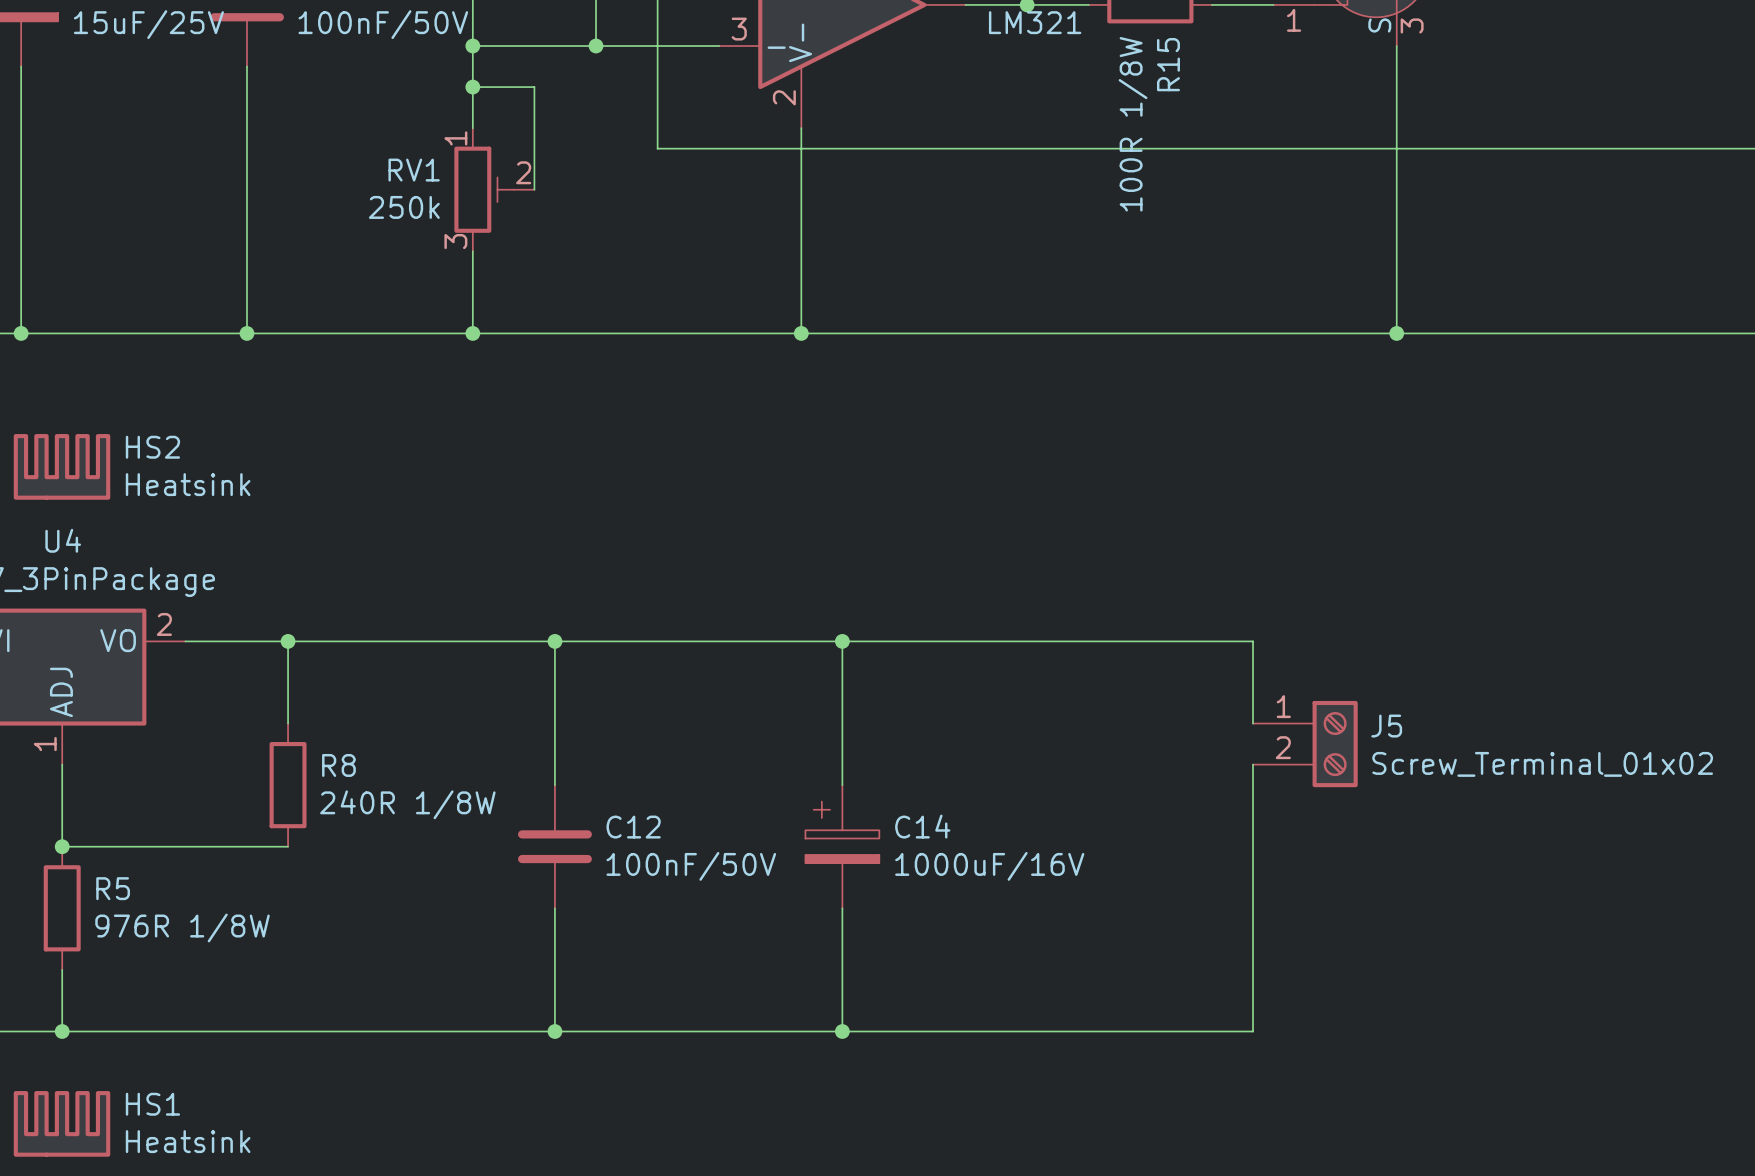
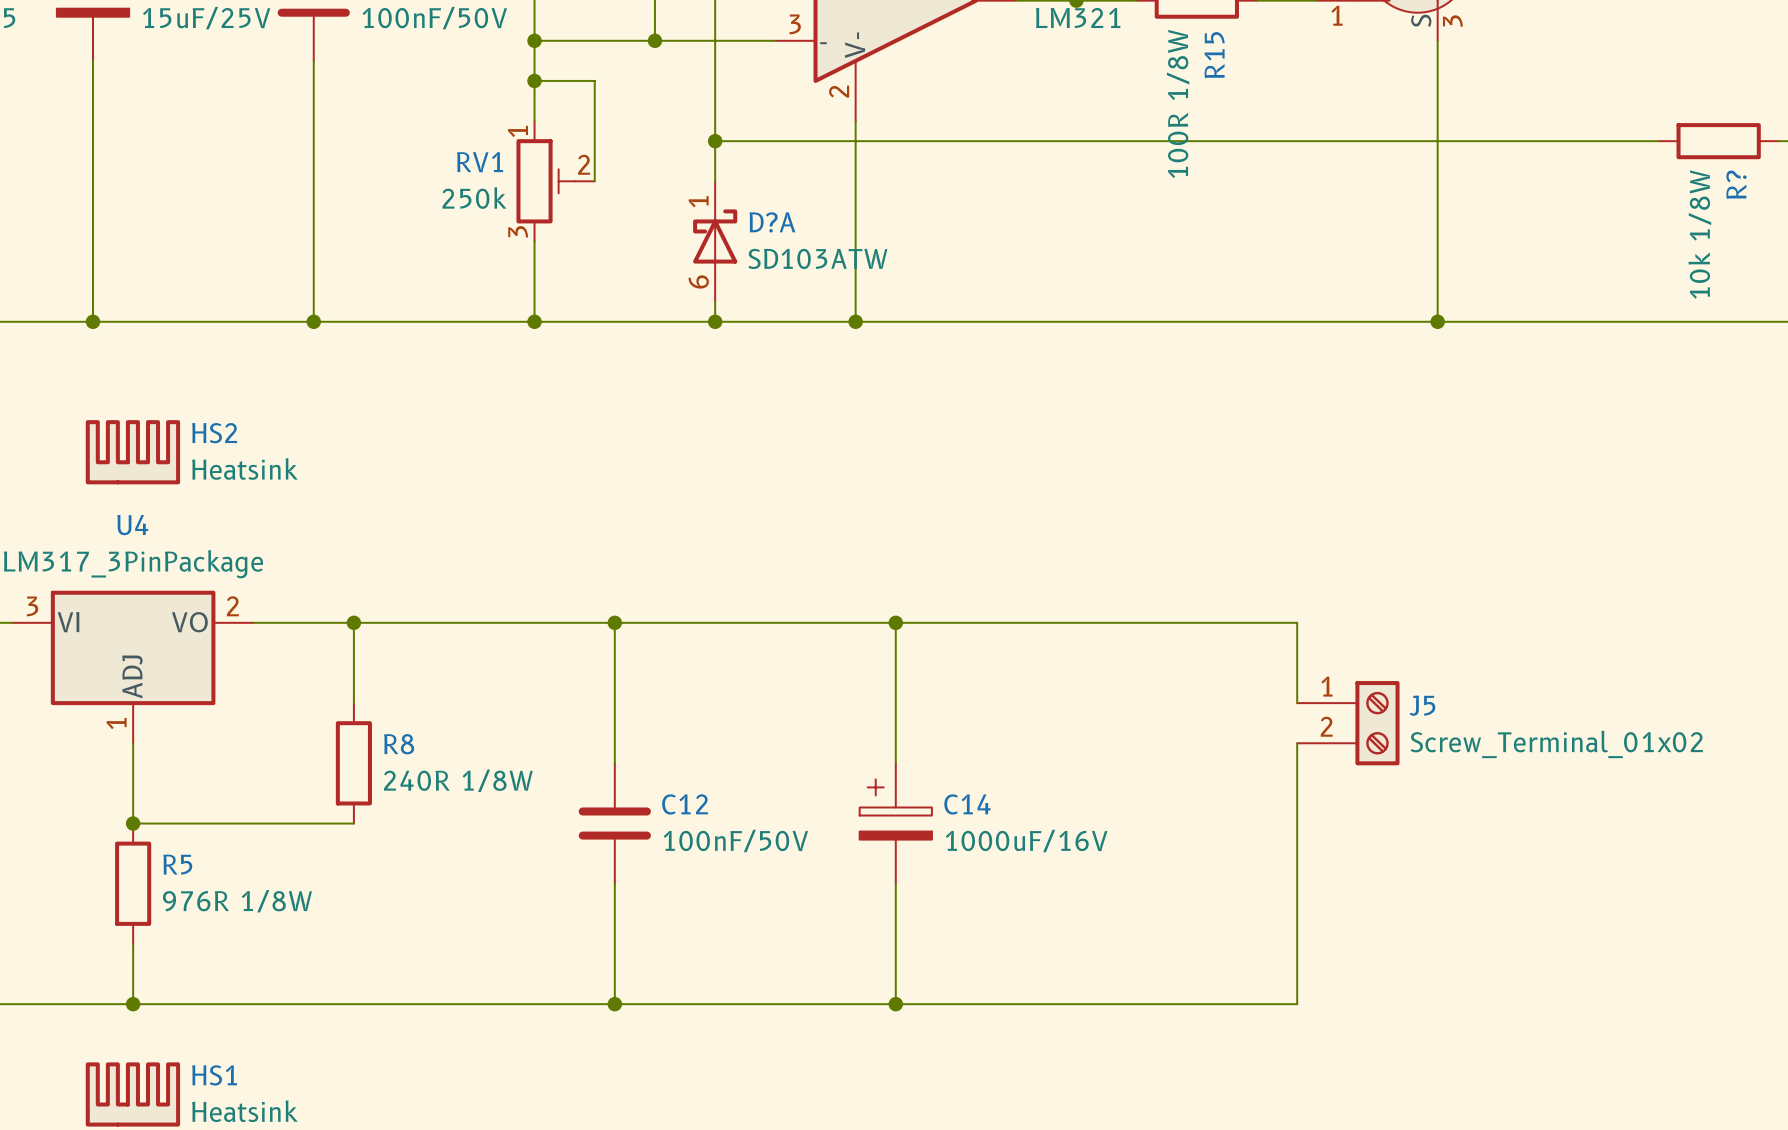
wire: none -> (715, 141) (715, 181)
junction: none -> (715, 141)
wire: (1622, 148) (1745, 148) -> none
R?: none -> 10k 1/8W (1718, 141)
D?A: none -> SD103ATW (715, 241)
wire: none -> (715, 301) (715, 321)
junction: none -> (715, 321)

